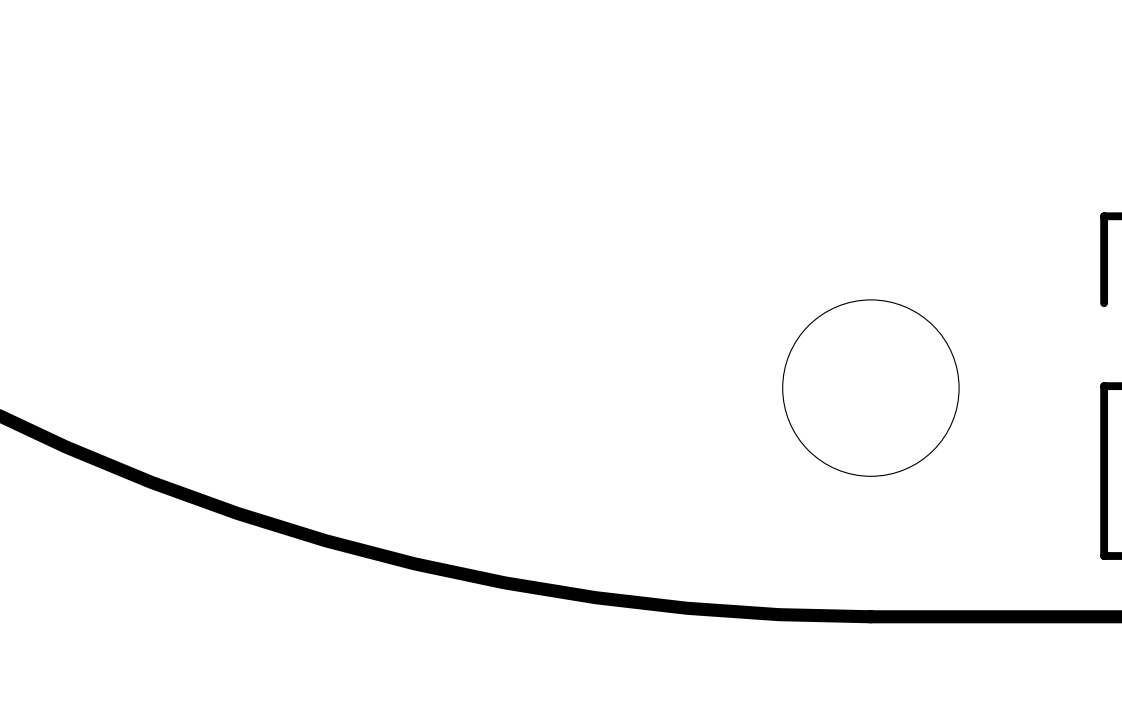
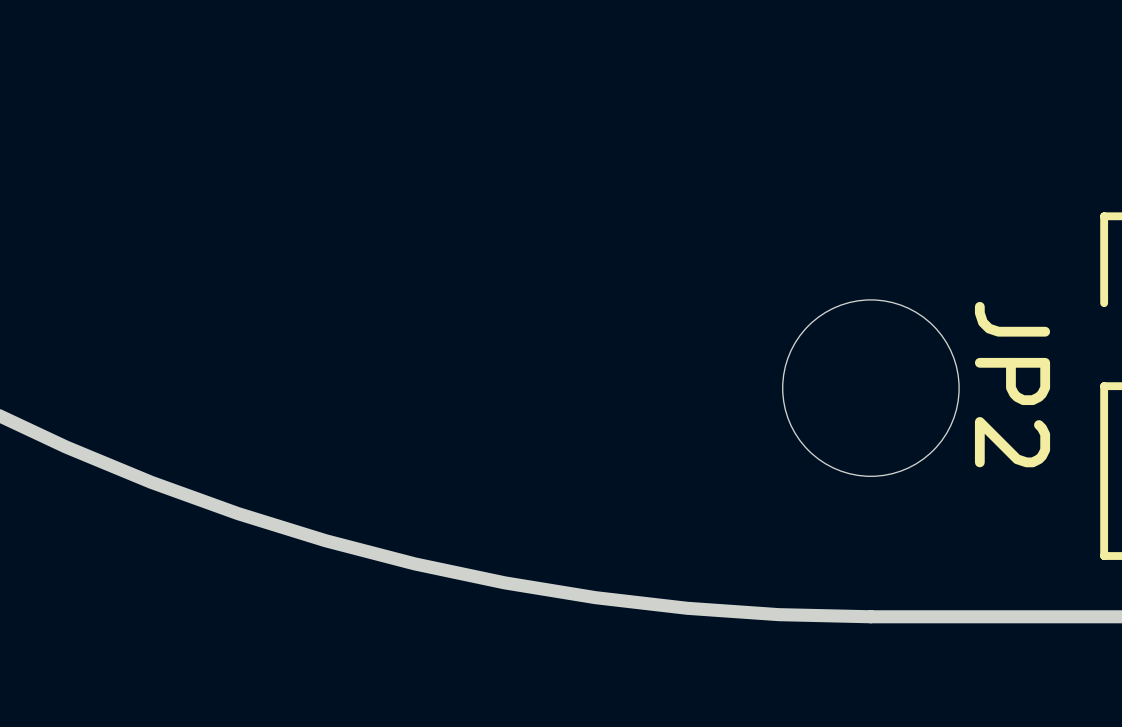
JP2 name: none -> JP2 (1012, 384)

